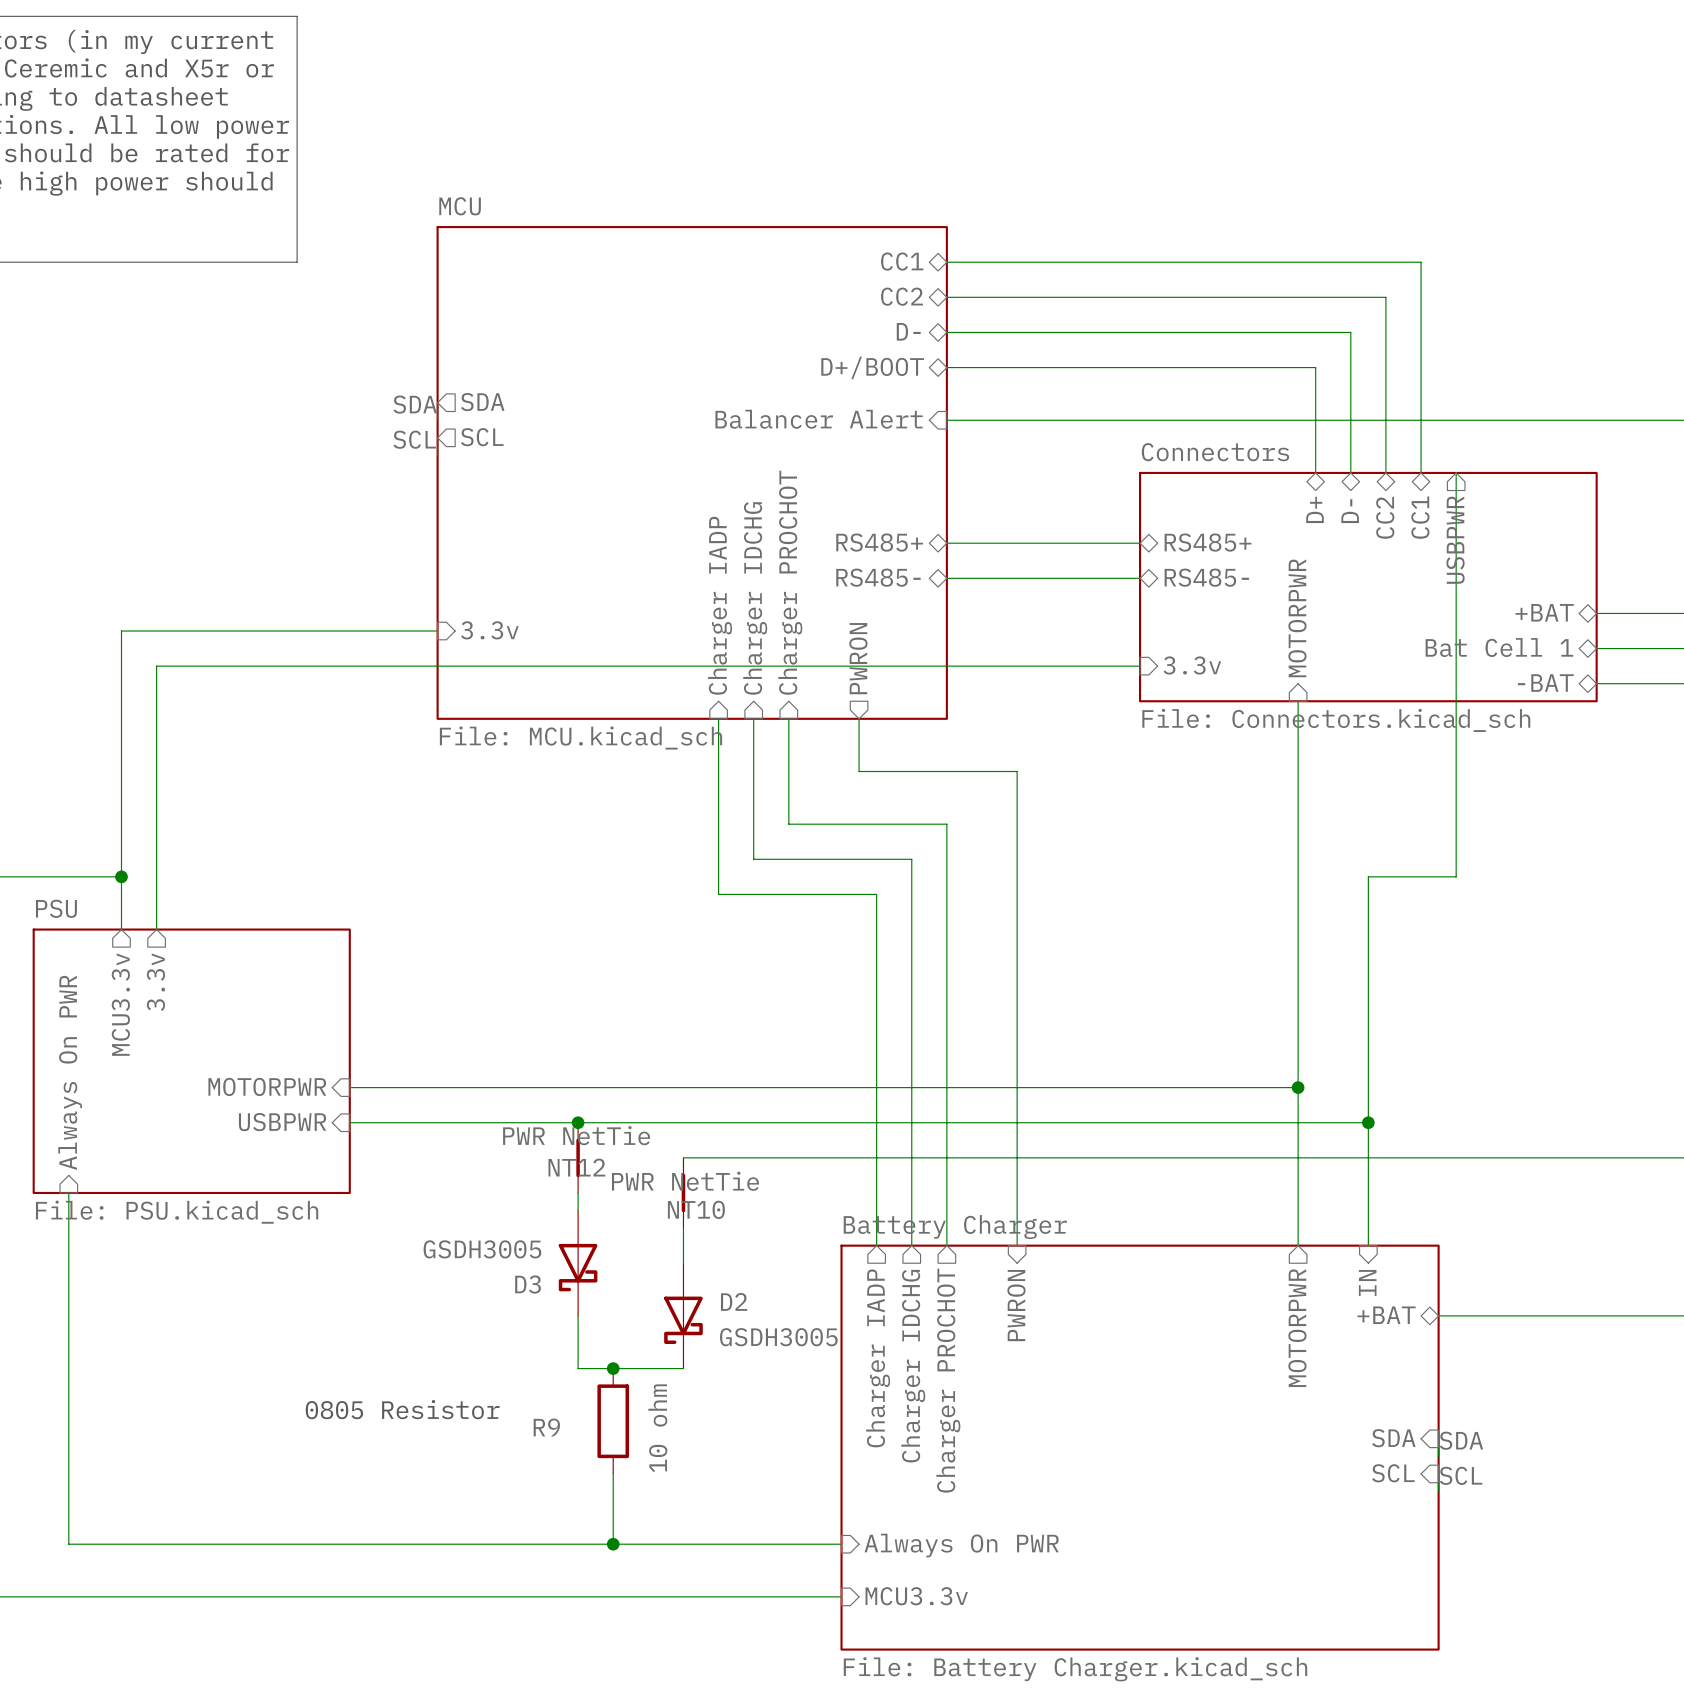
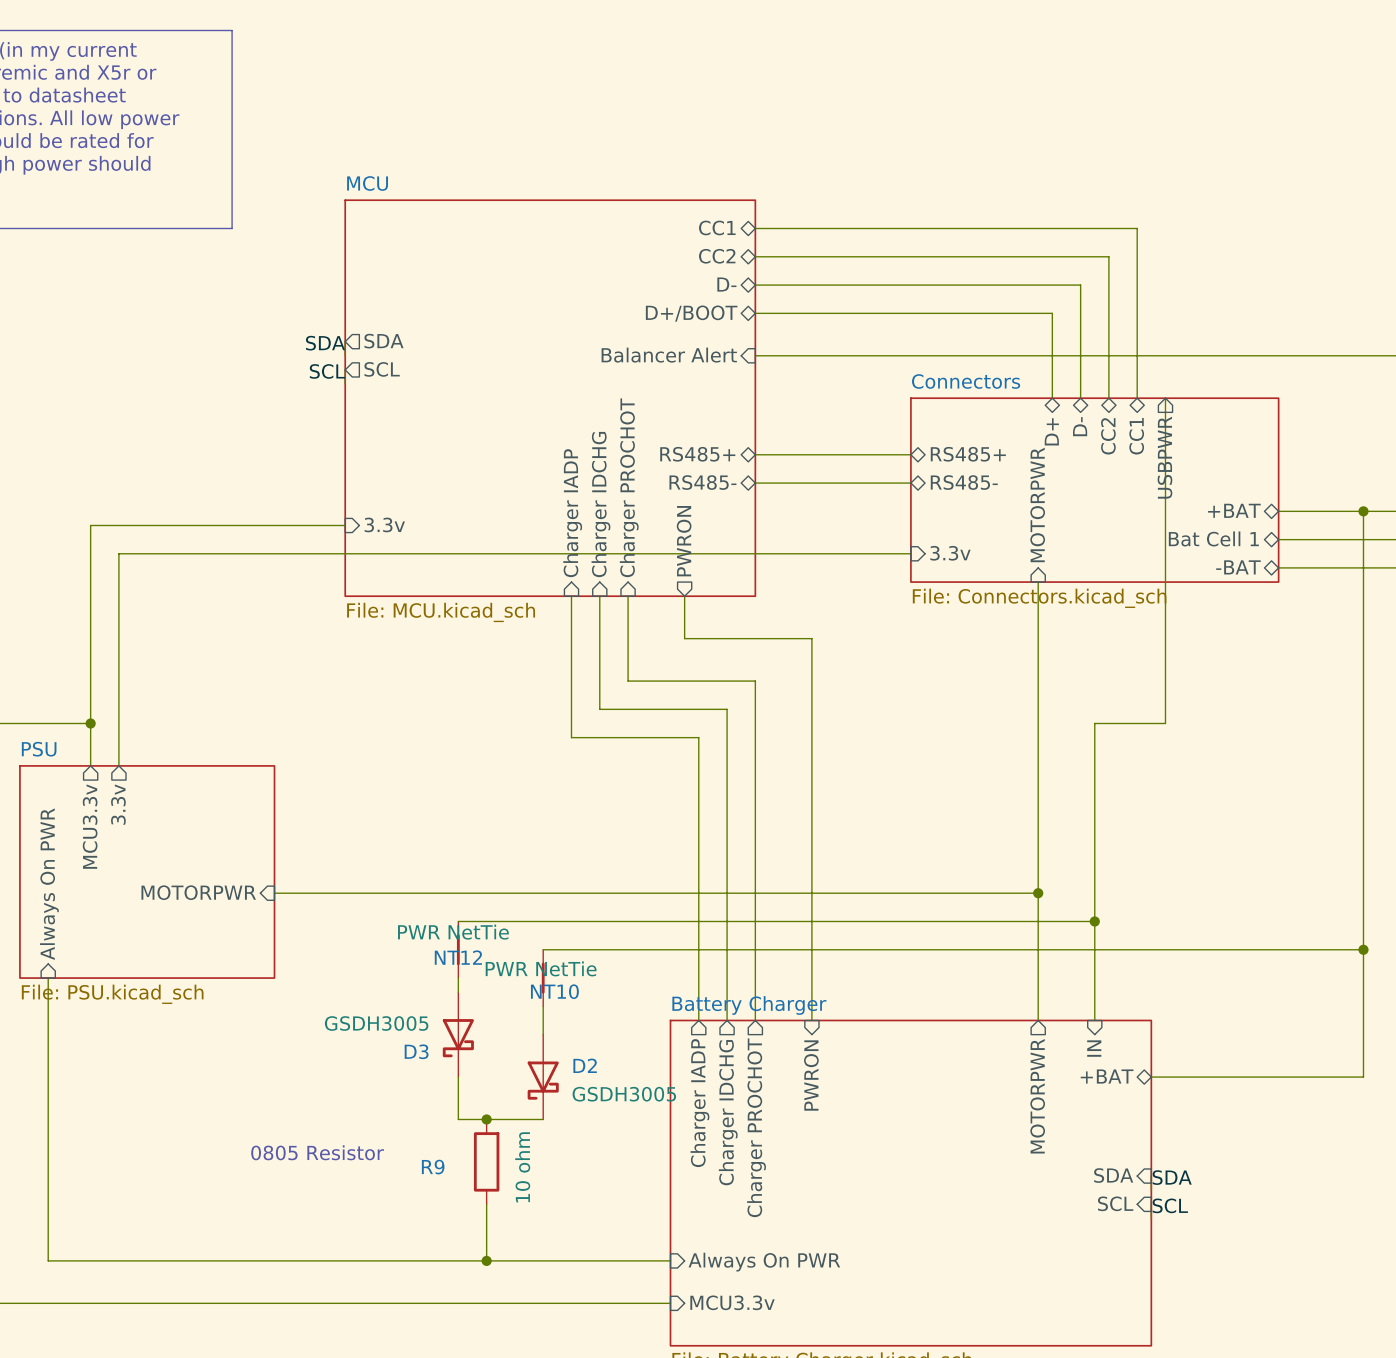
sheet pin: USBPWR (282, 1122) -> none
wire: (349, 1122) (578, 1122) -> none
junction: (578, 1122) -> none

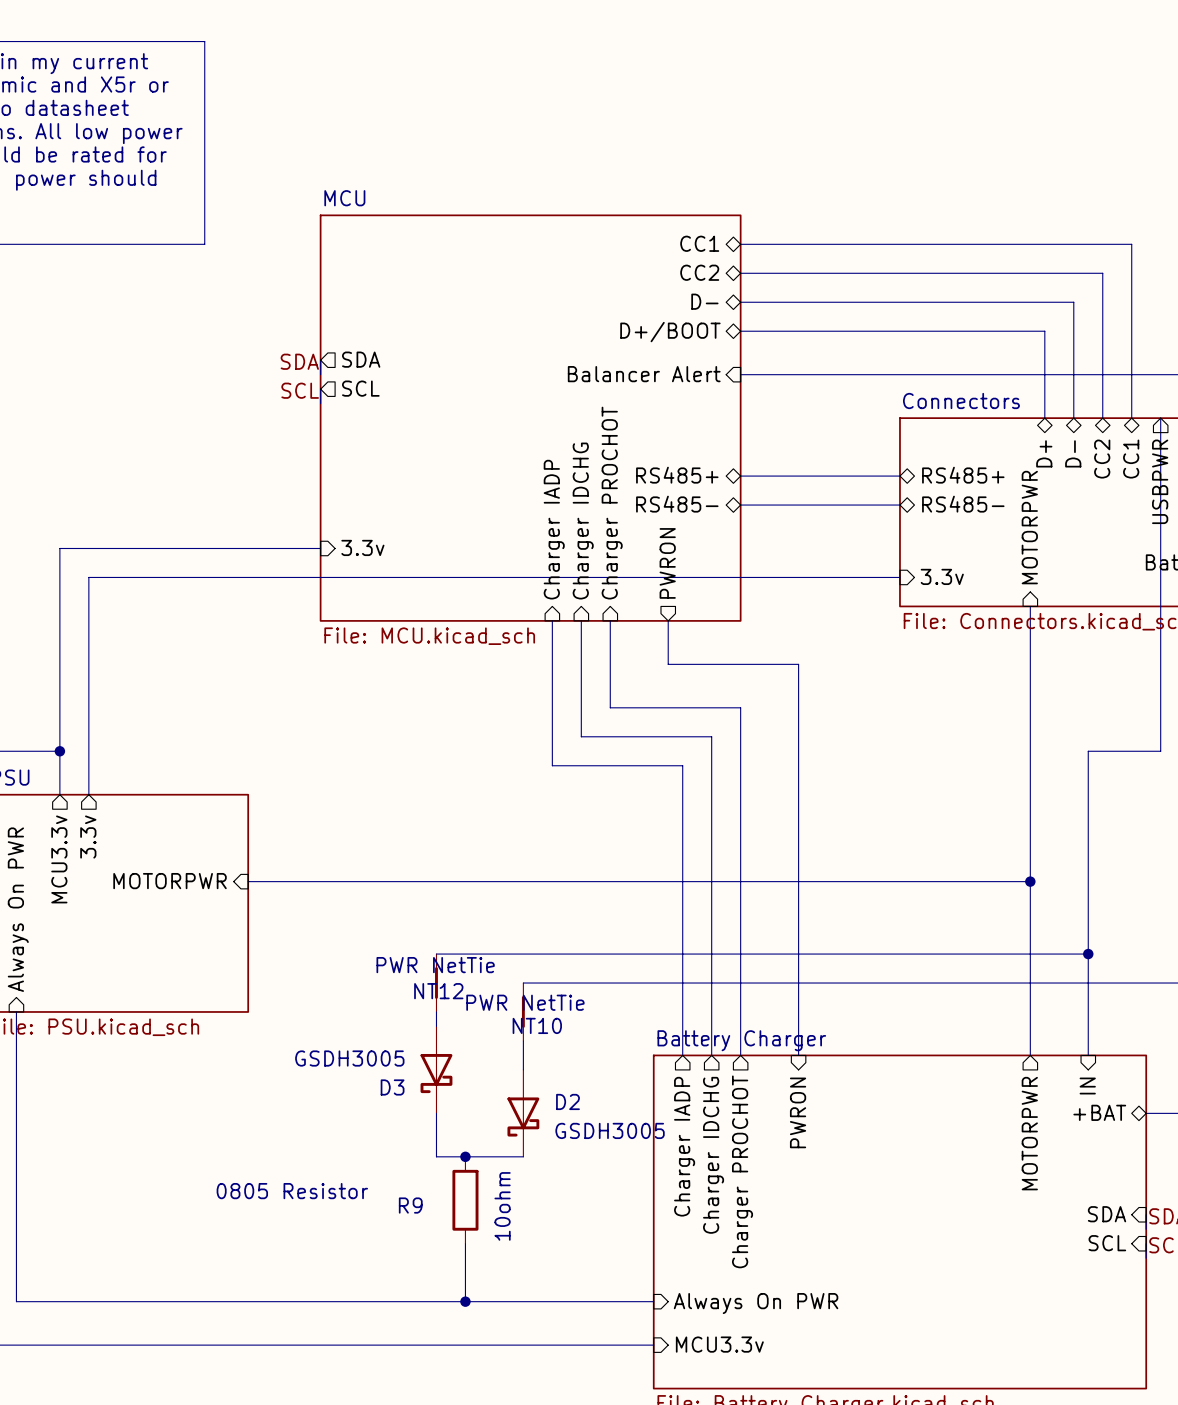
sheet pin position: MOTORPWR (198, 892) -> MOTORPWR (170, 881)
wire: (274, 893) (1038, 893) -> (248, 881) (1030, 881)
junction position: (1038, 893) -> (1030, 881)
R9 value: 10 ohm (522, 1167) -> 10ohm (502, 1206)

